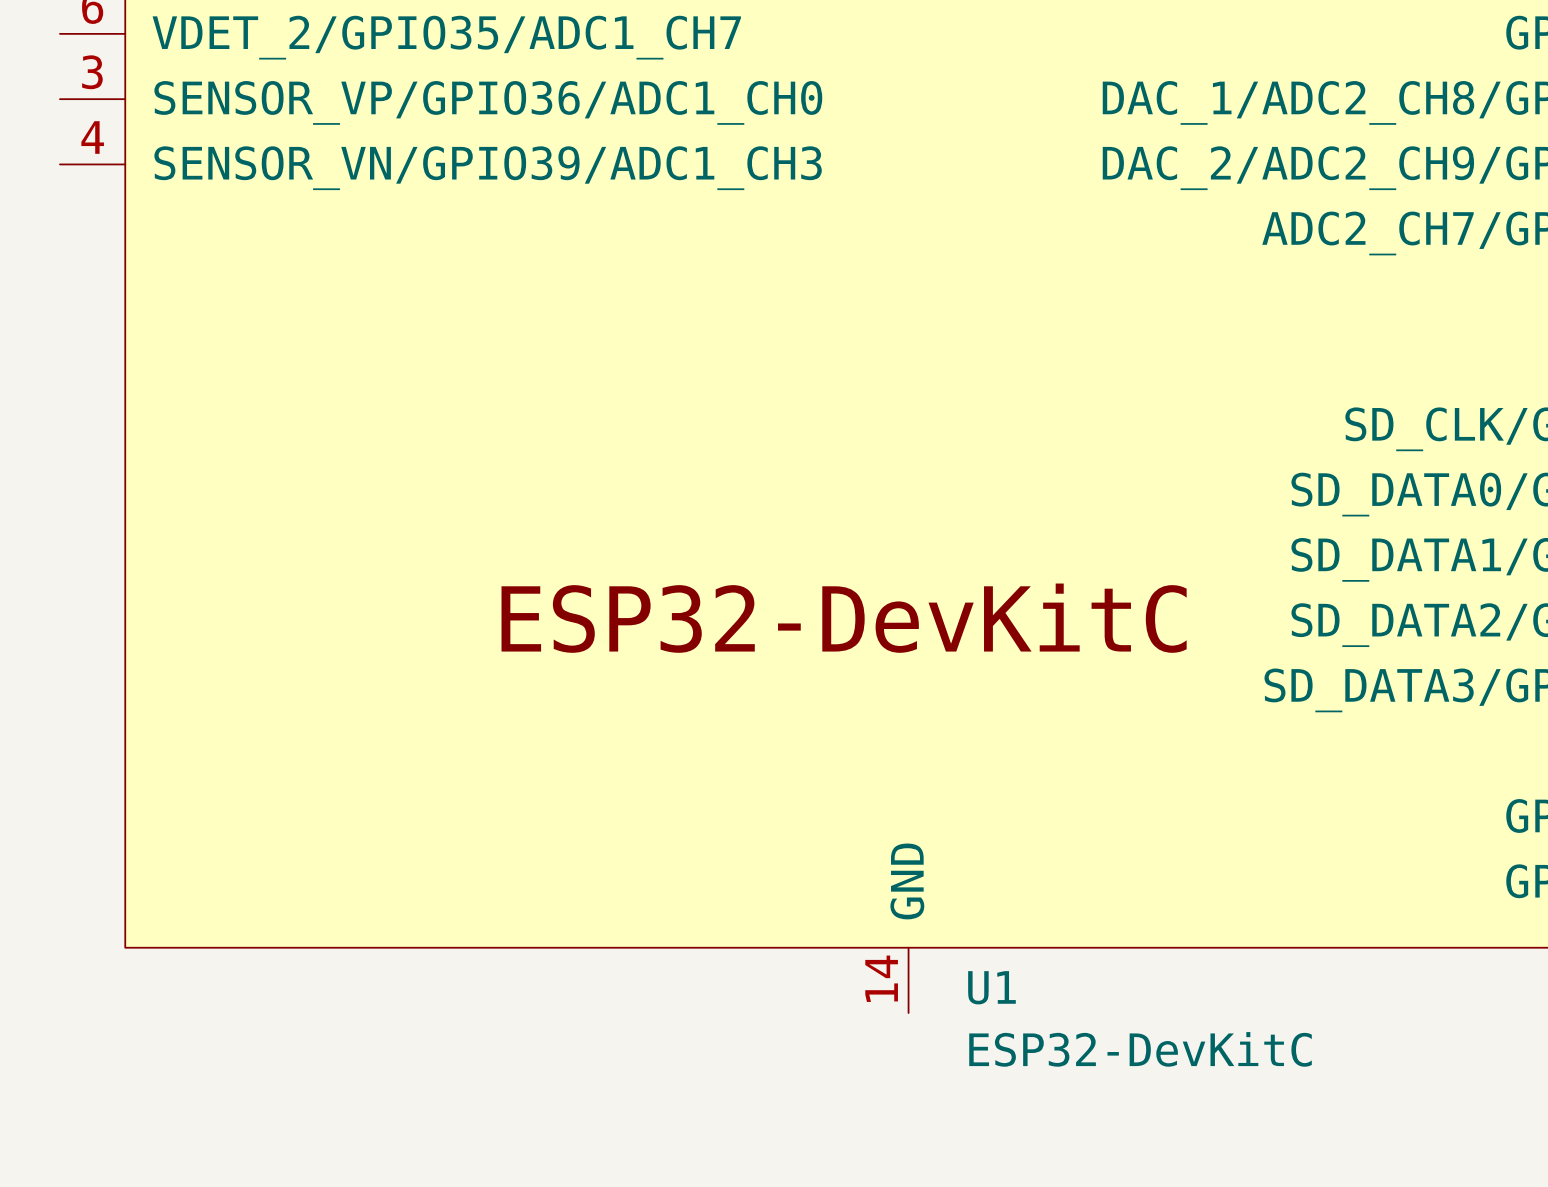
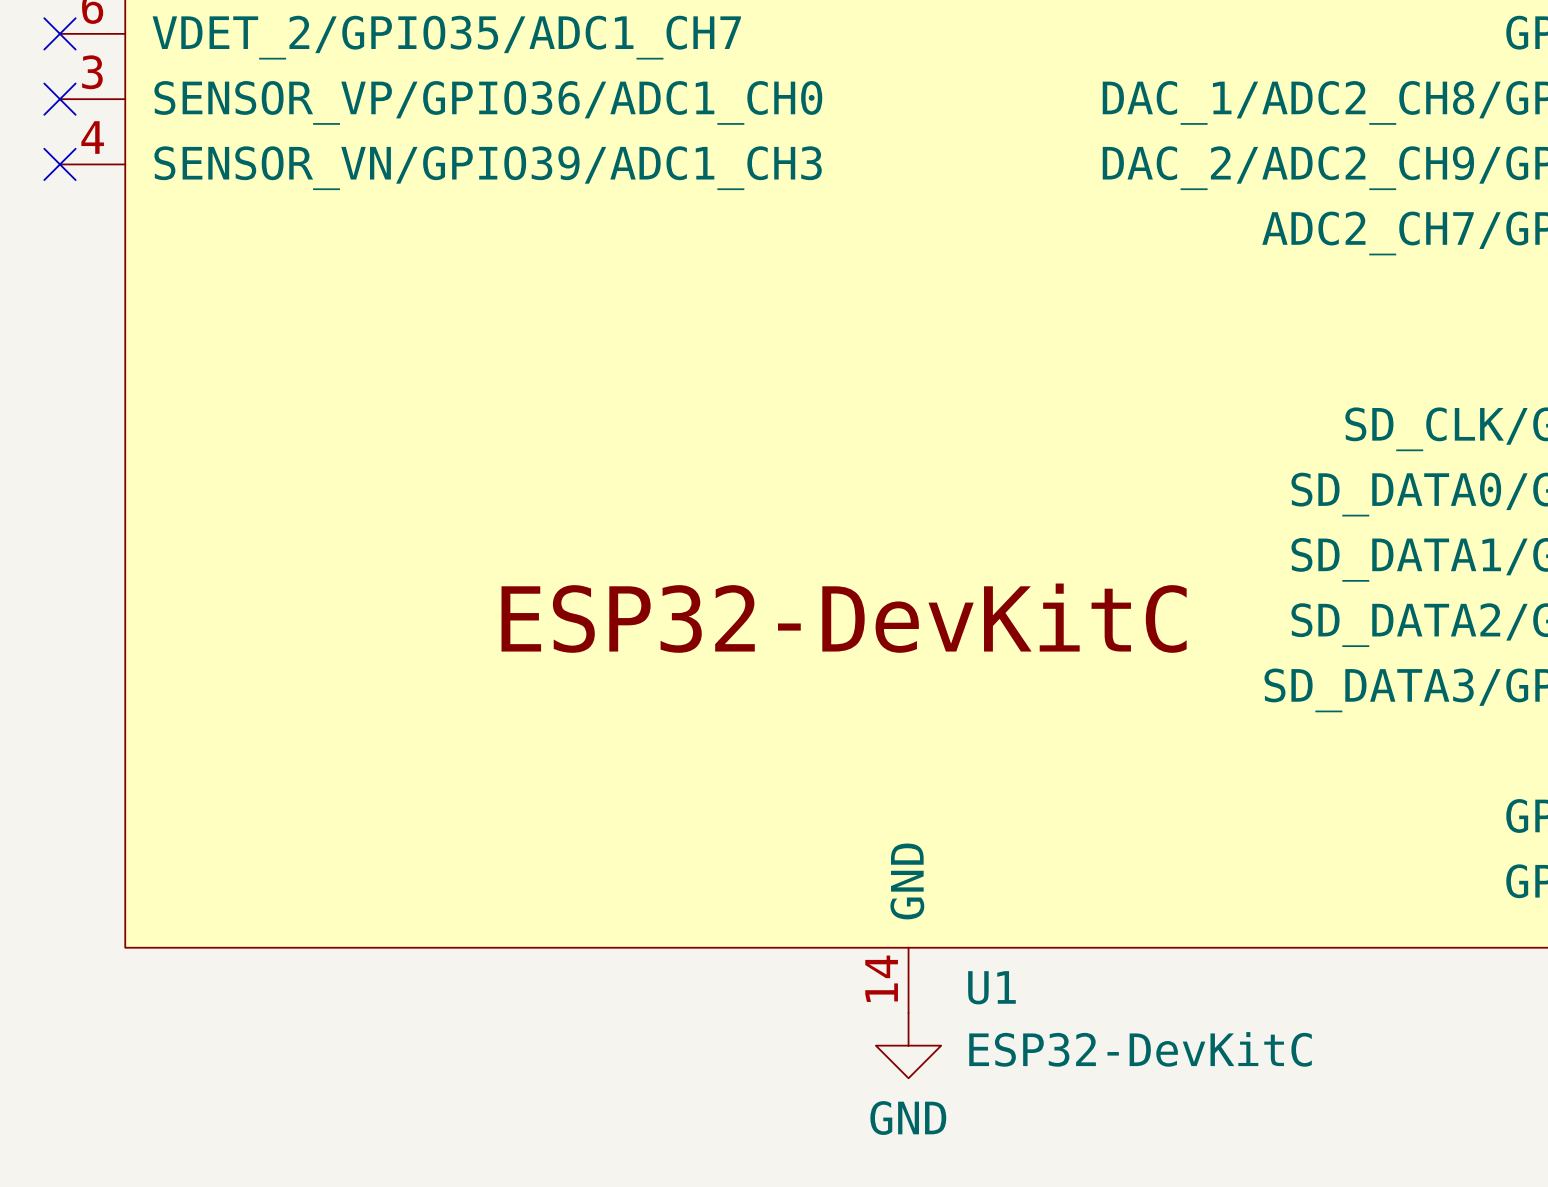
no-connect mark: none -> (59, 33)
no-connect mark: none -> (59, 99)
no-connect mark: none -> (59, 164)
power symbol: none -> GND (908, 1045)

